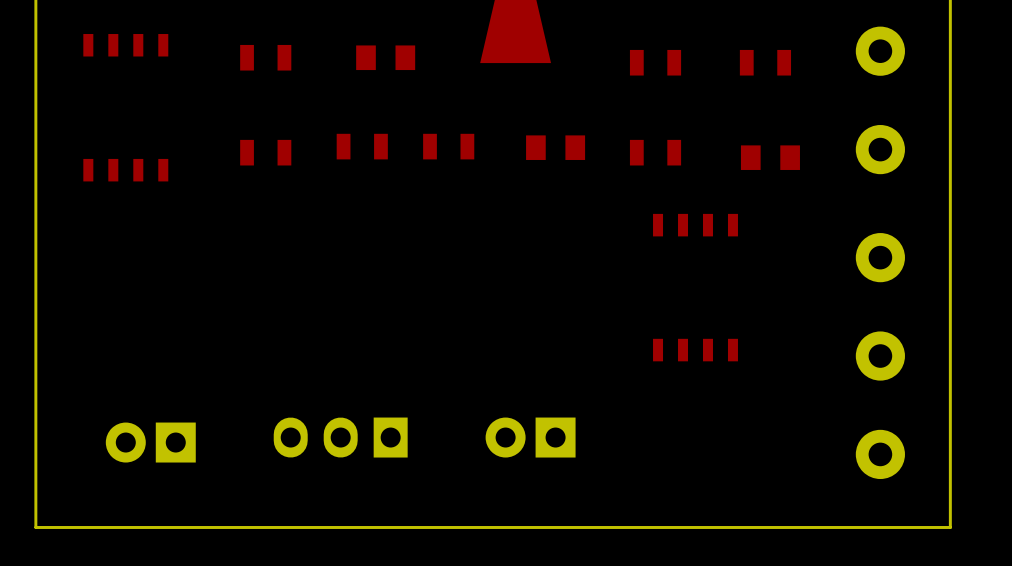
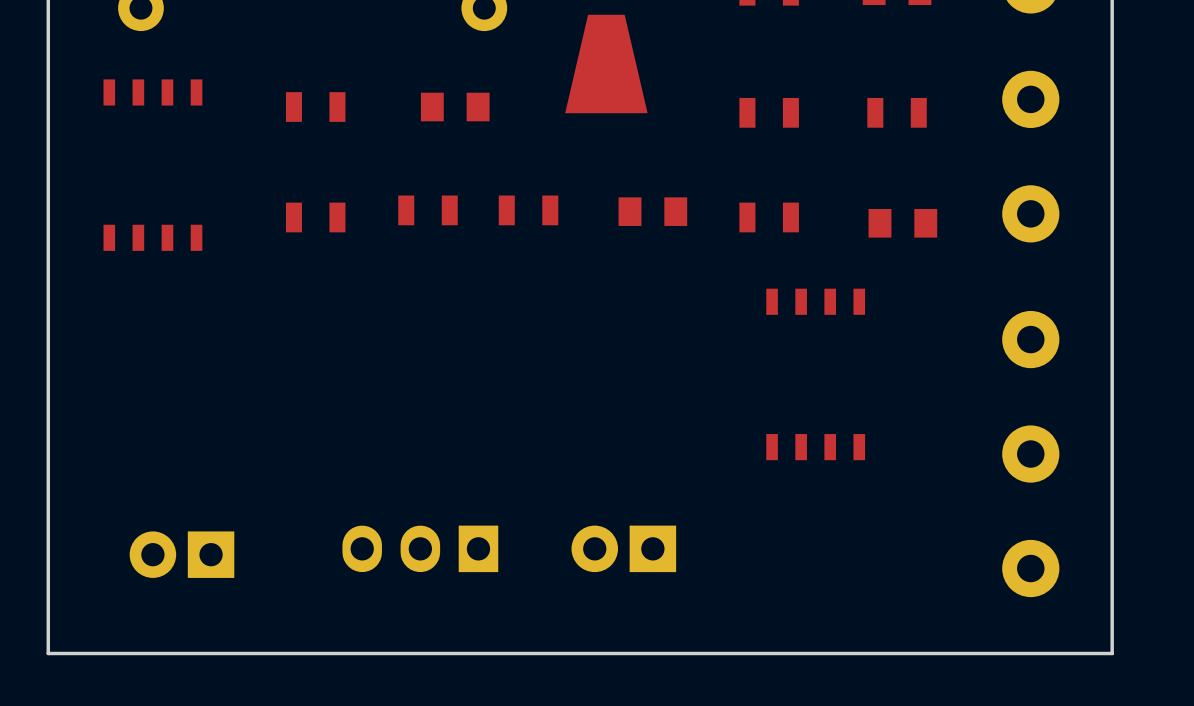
part position: (340, 437) -> (420, 548)

